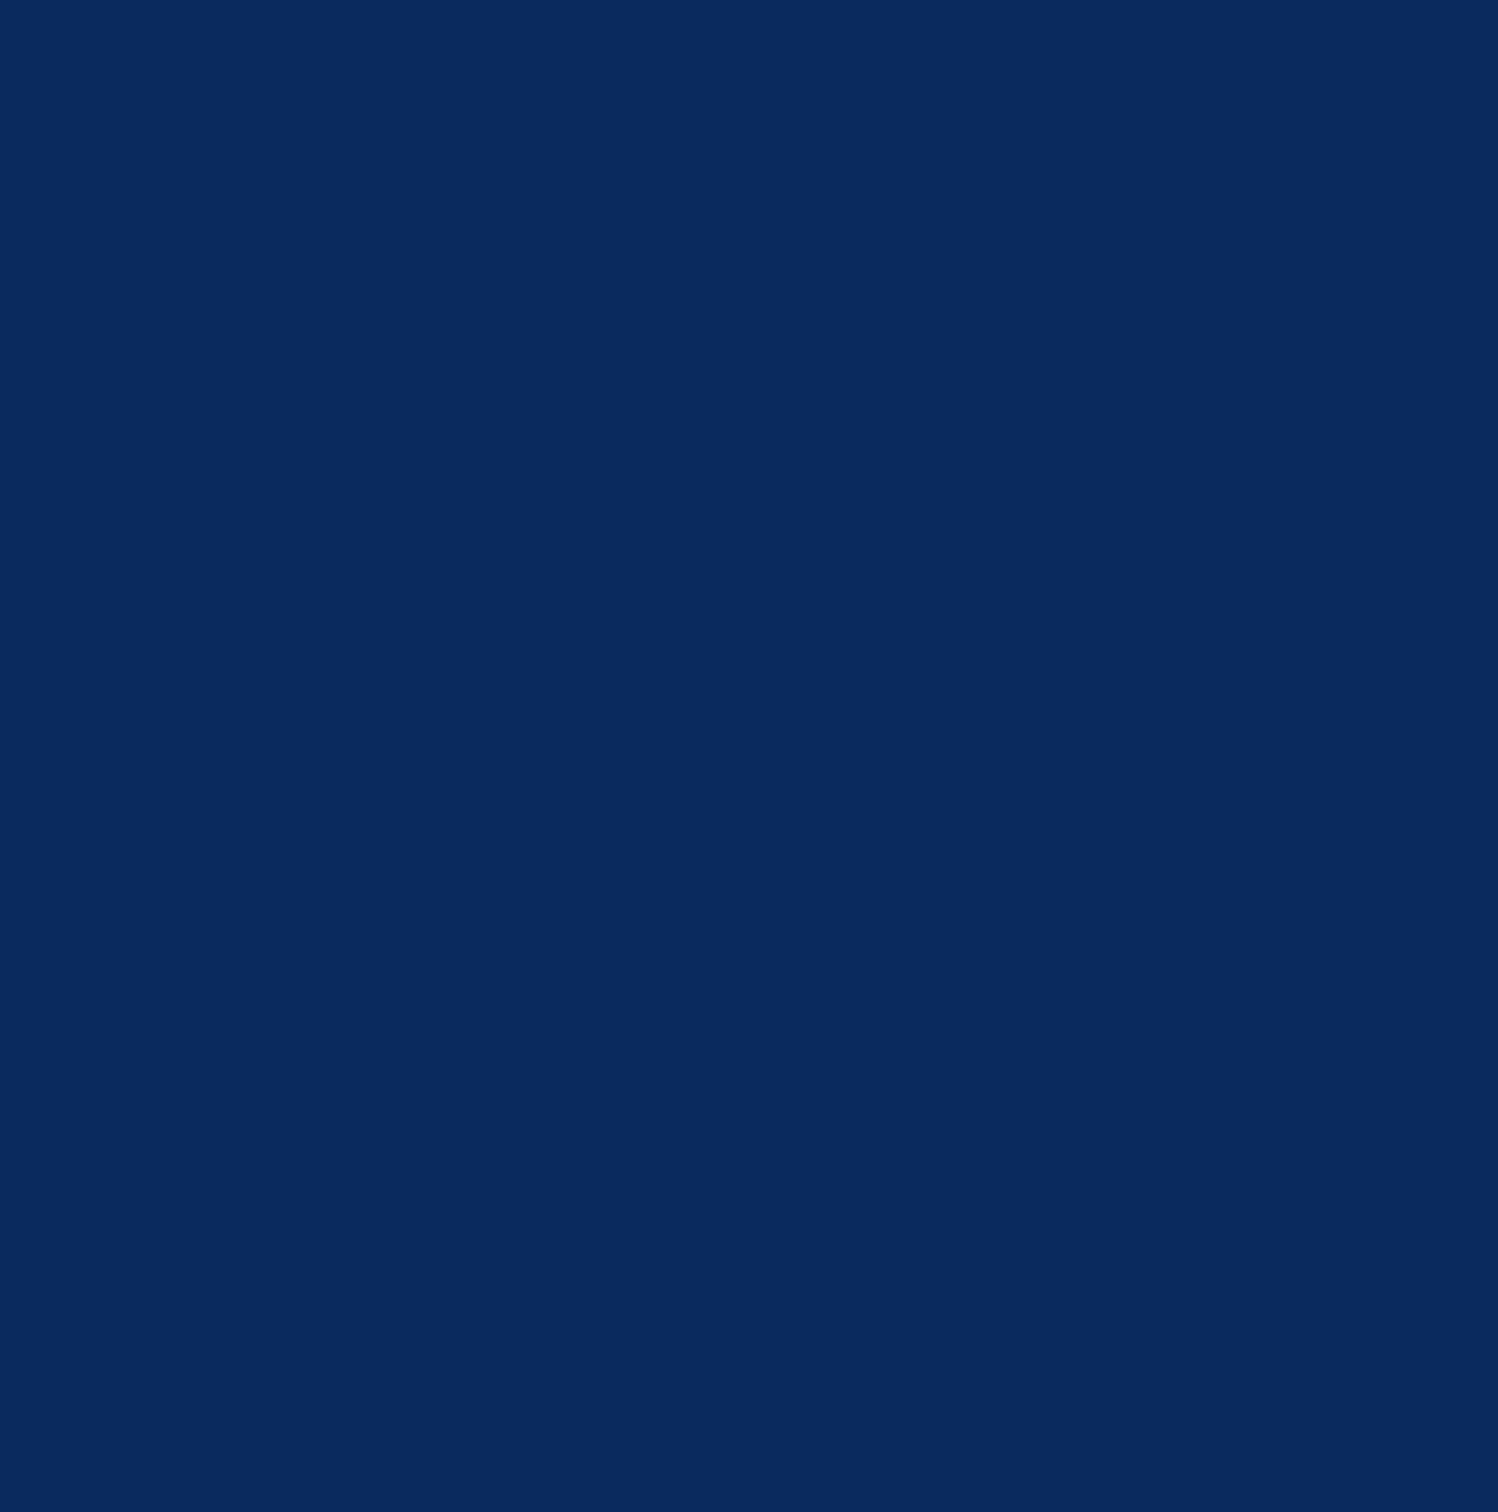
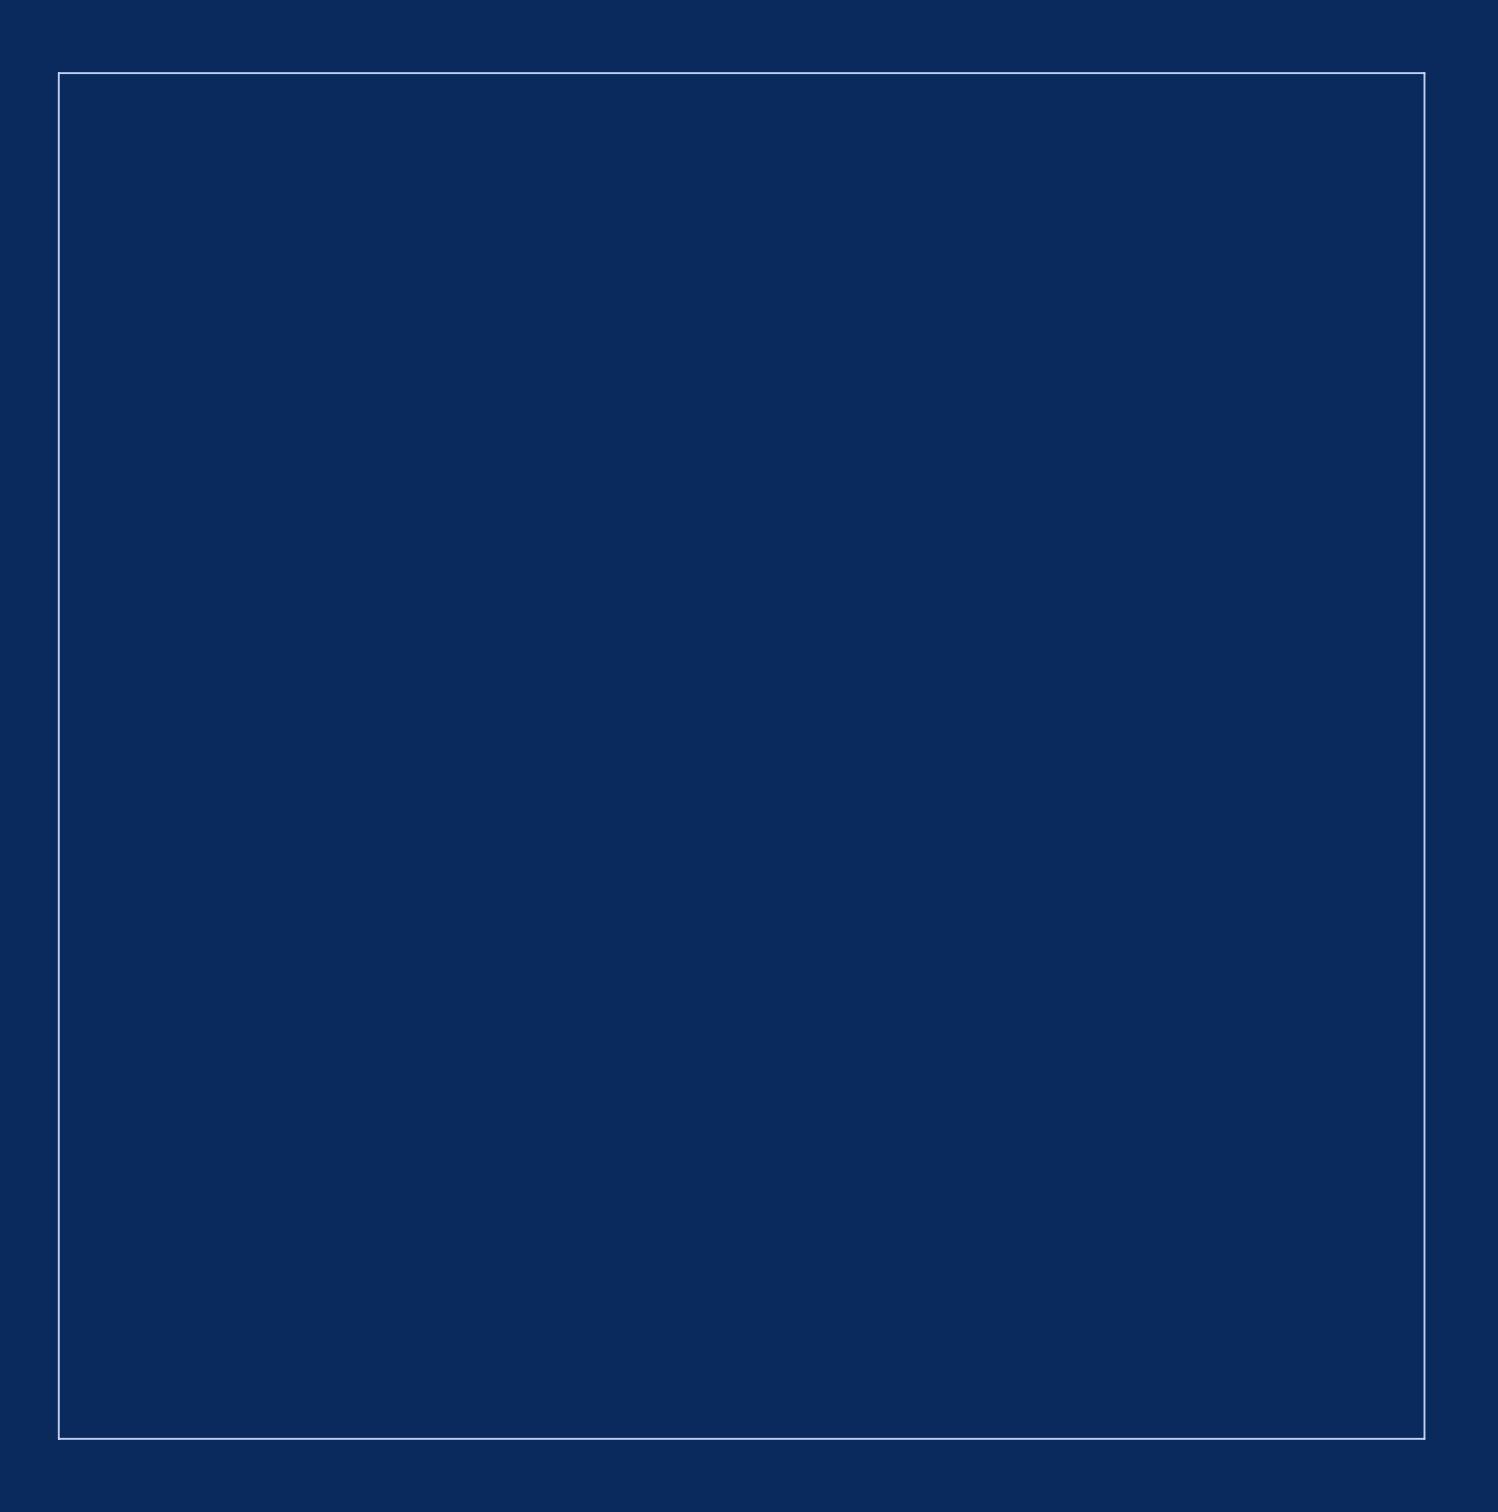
board edge: none -> (58, 73) (1424, 73) (1424, 1438) (58, 1438) (58, 73)

